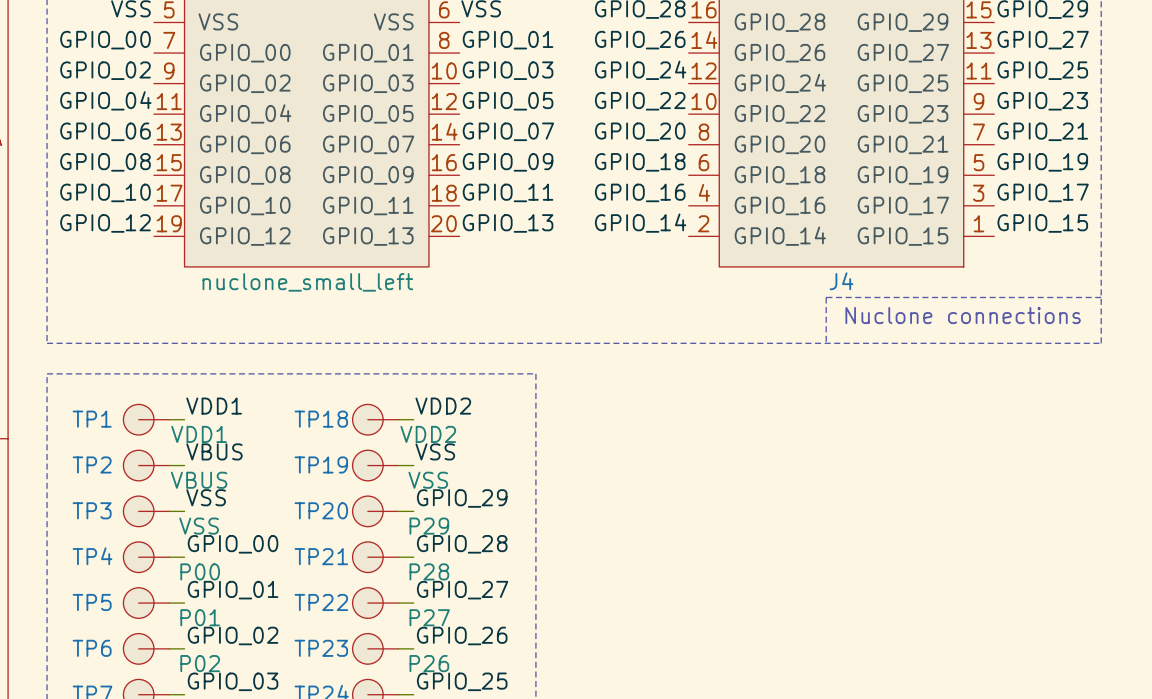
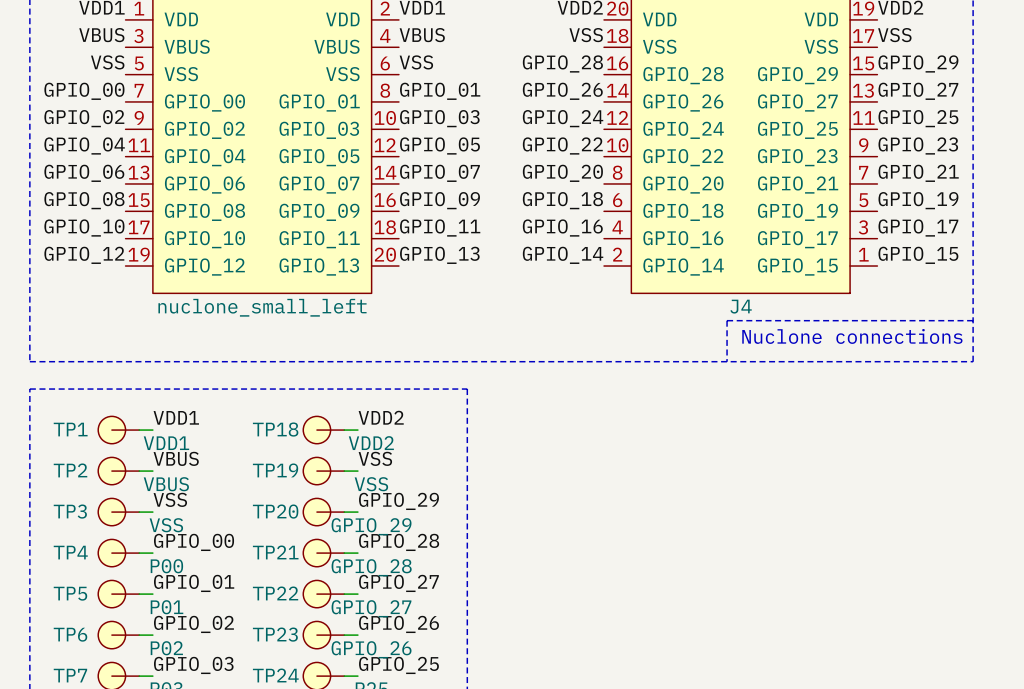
TP20 value: P29 (429, 526) -> GPIO_29 (371, 526)
TP21 value: P28 (429, 571) -> GPIO_28 (371, 567)
TP22 value: P27 (429, 617) -> GPIO_27 (371, 608)
TP23 value: P26 (429, 663) -> GPIO_26 (371, 649)

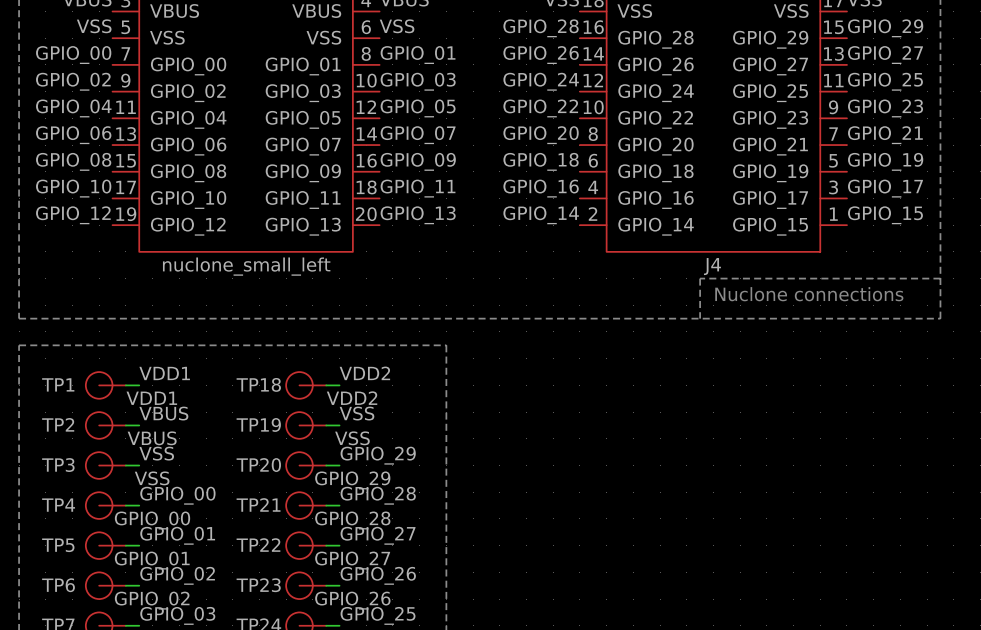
TP4 value: P00 (166, 566) -> GPIO_00 (152, 520)
TP5 value: P01 (166, 607) -> GPIO_01 (152, 560)
TP6 value: P02 (166, 648) -> GPIO_02 (152, 600)

